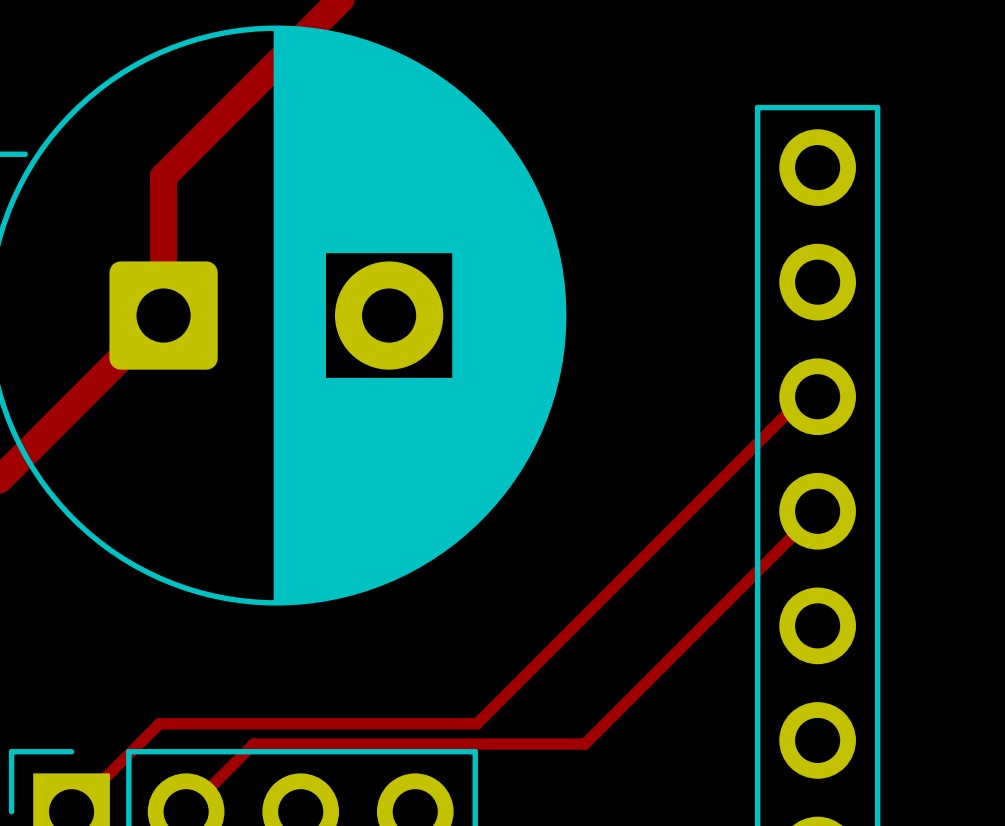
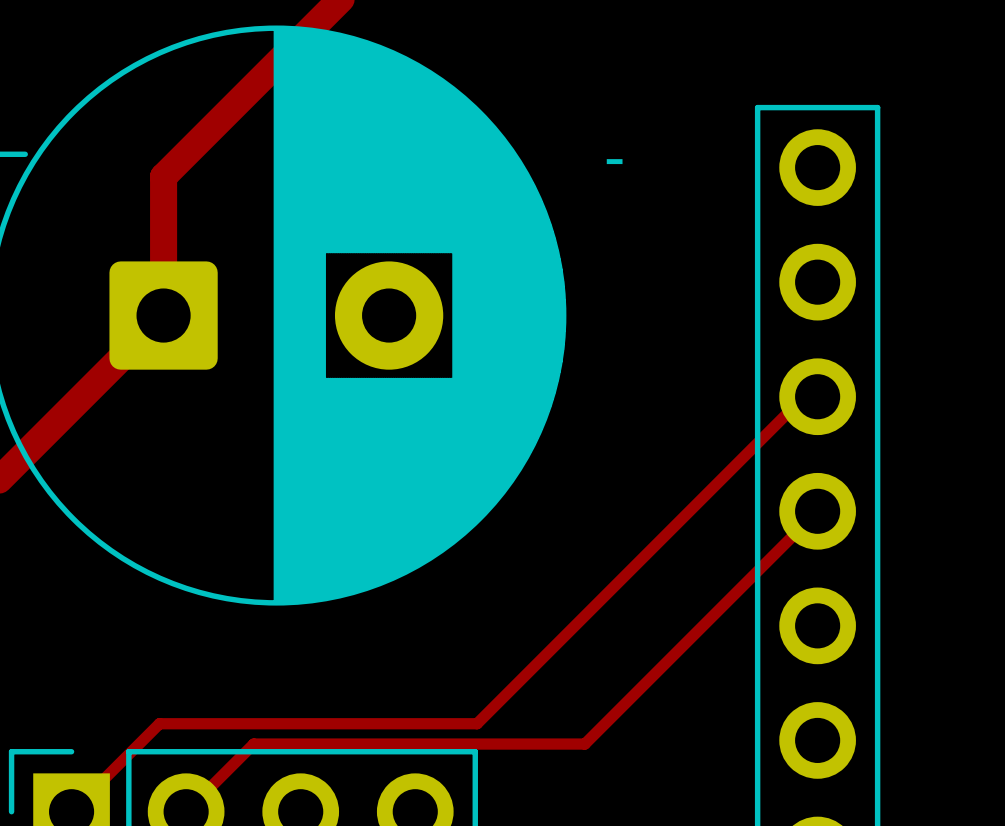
text: none -> - (614, 161)

